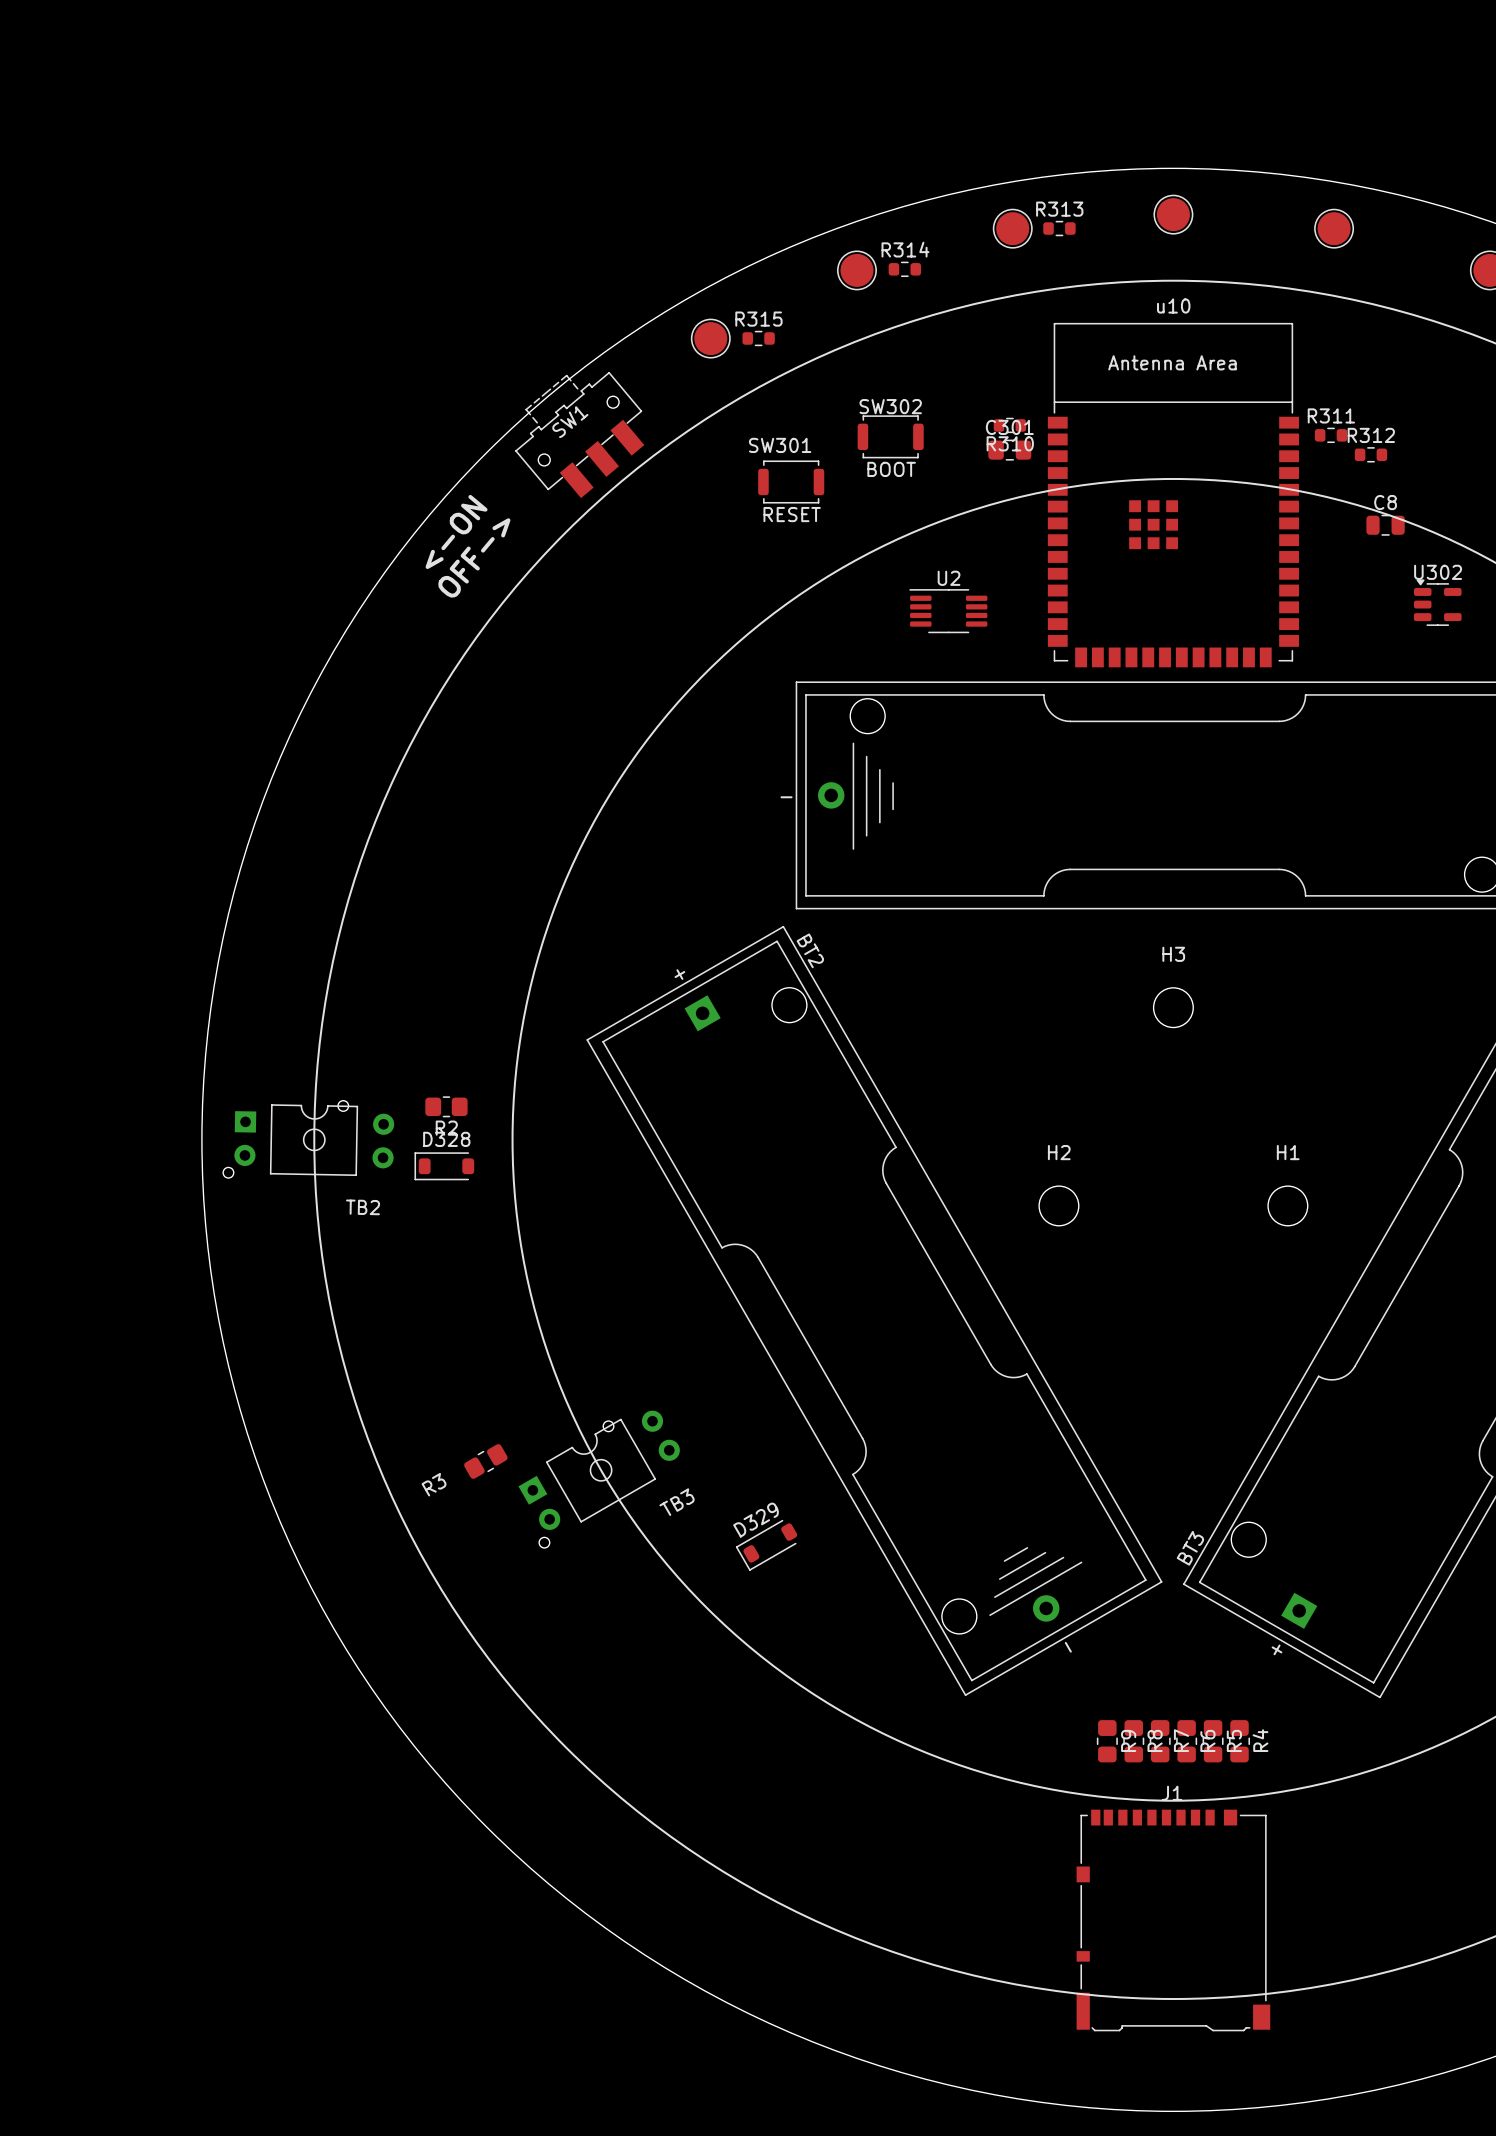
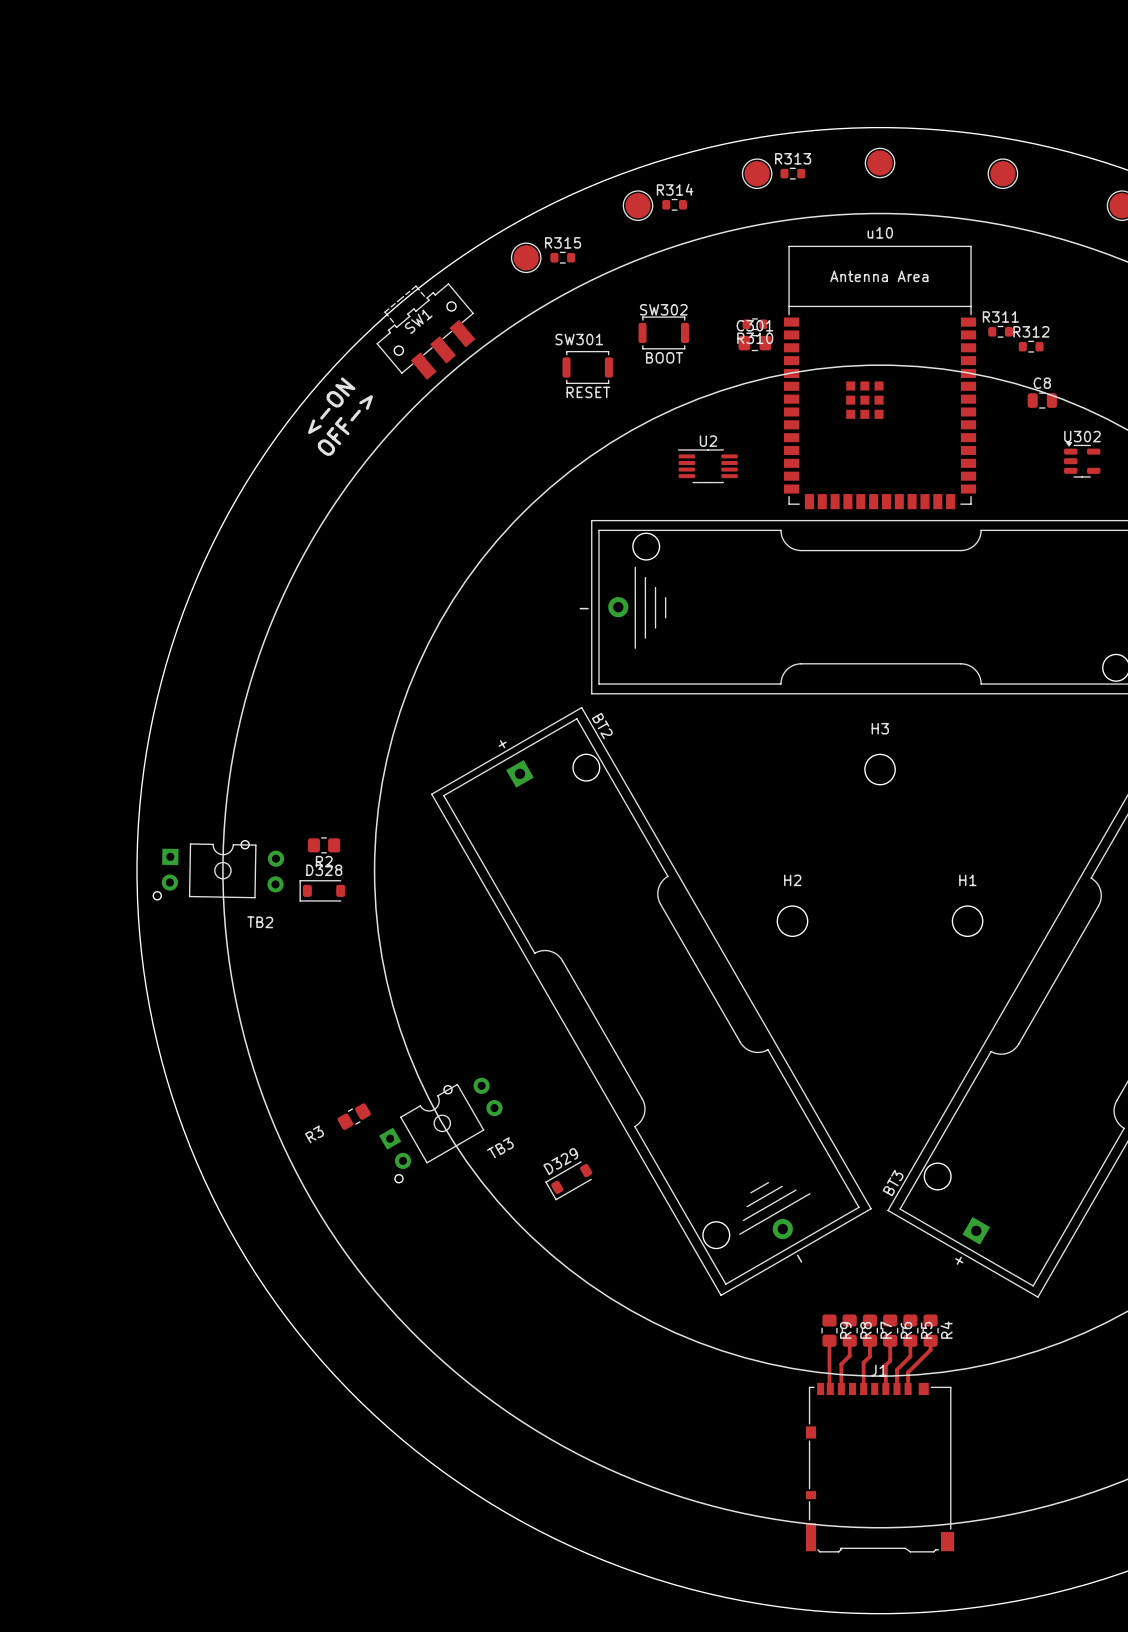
track: none -> (829, 1340) (830, 1388)
track: none -> (849, 1340) (849, 1355) (841, 1364) (841, 1388)
track: none -> (869, 1340) (869, 1356) (863, 1362) (863, 1388)
track: none -> (890, 1340) (890, 1360) (885, 1365) (885, 1388)
track: none -> (910, 1340) (910, 1356) (896, 1369) (896, 1388)
track: none -> (930, 1340) (930, 1349) (908, 1372) (908, 1388)

